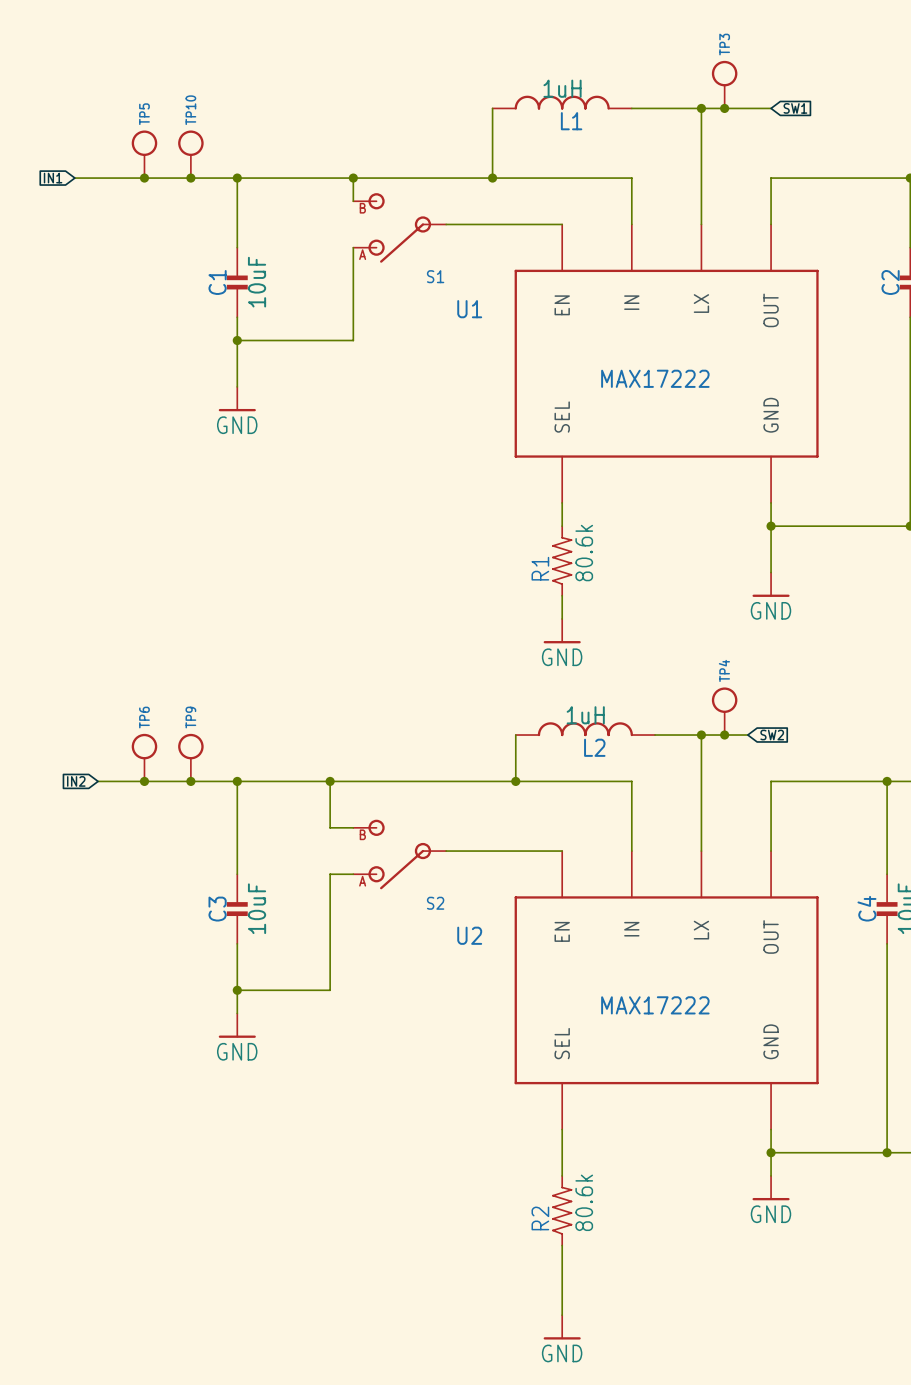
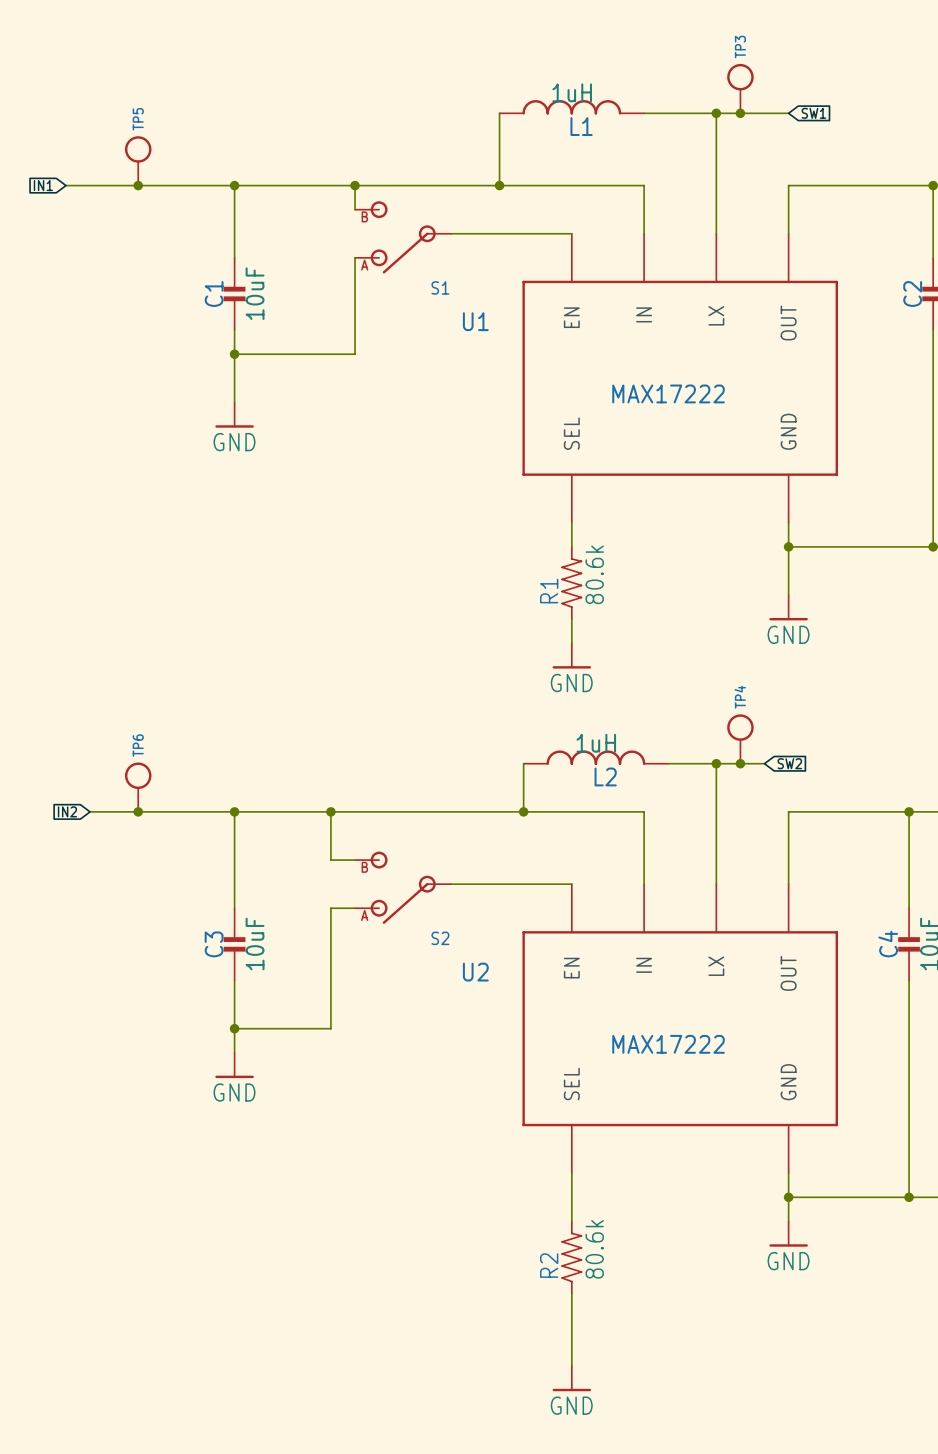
TP10: (190, 154) -> none
junction: (190, 178) -> none
TP9: (190, 757) -> none
junction: (190, 781) -> none

